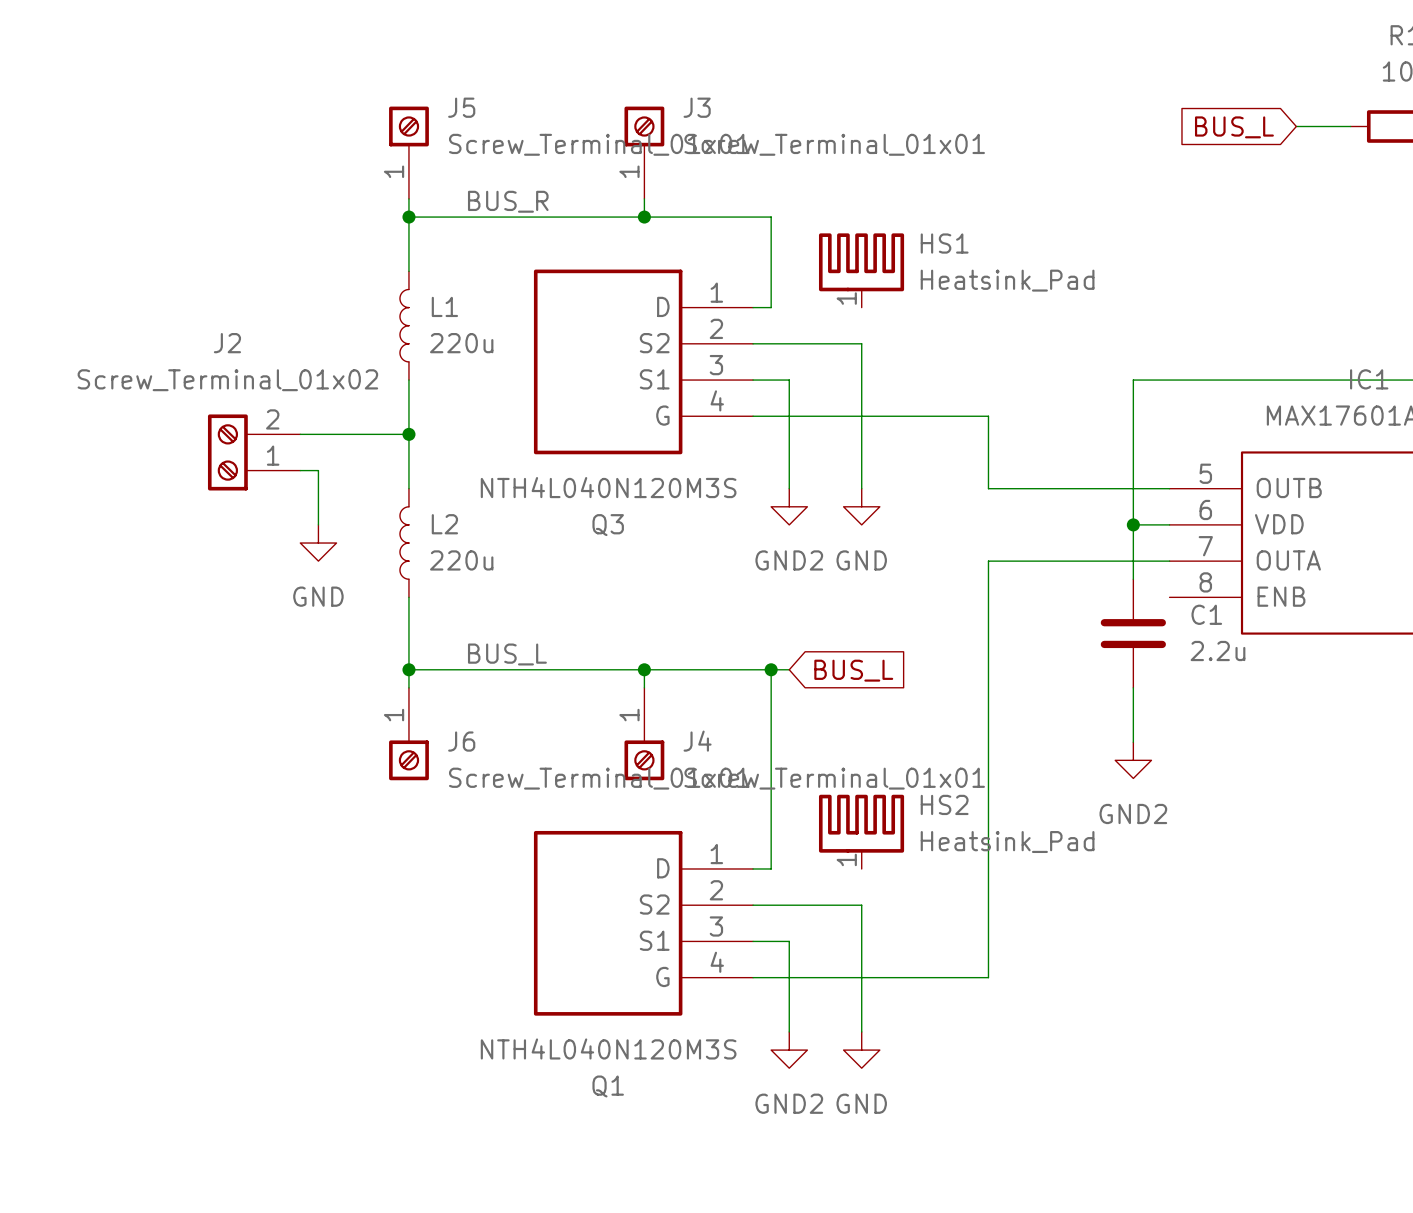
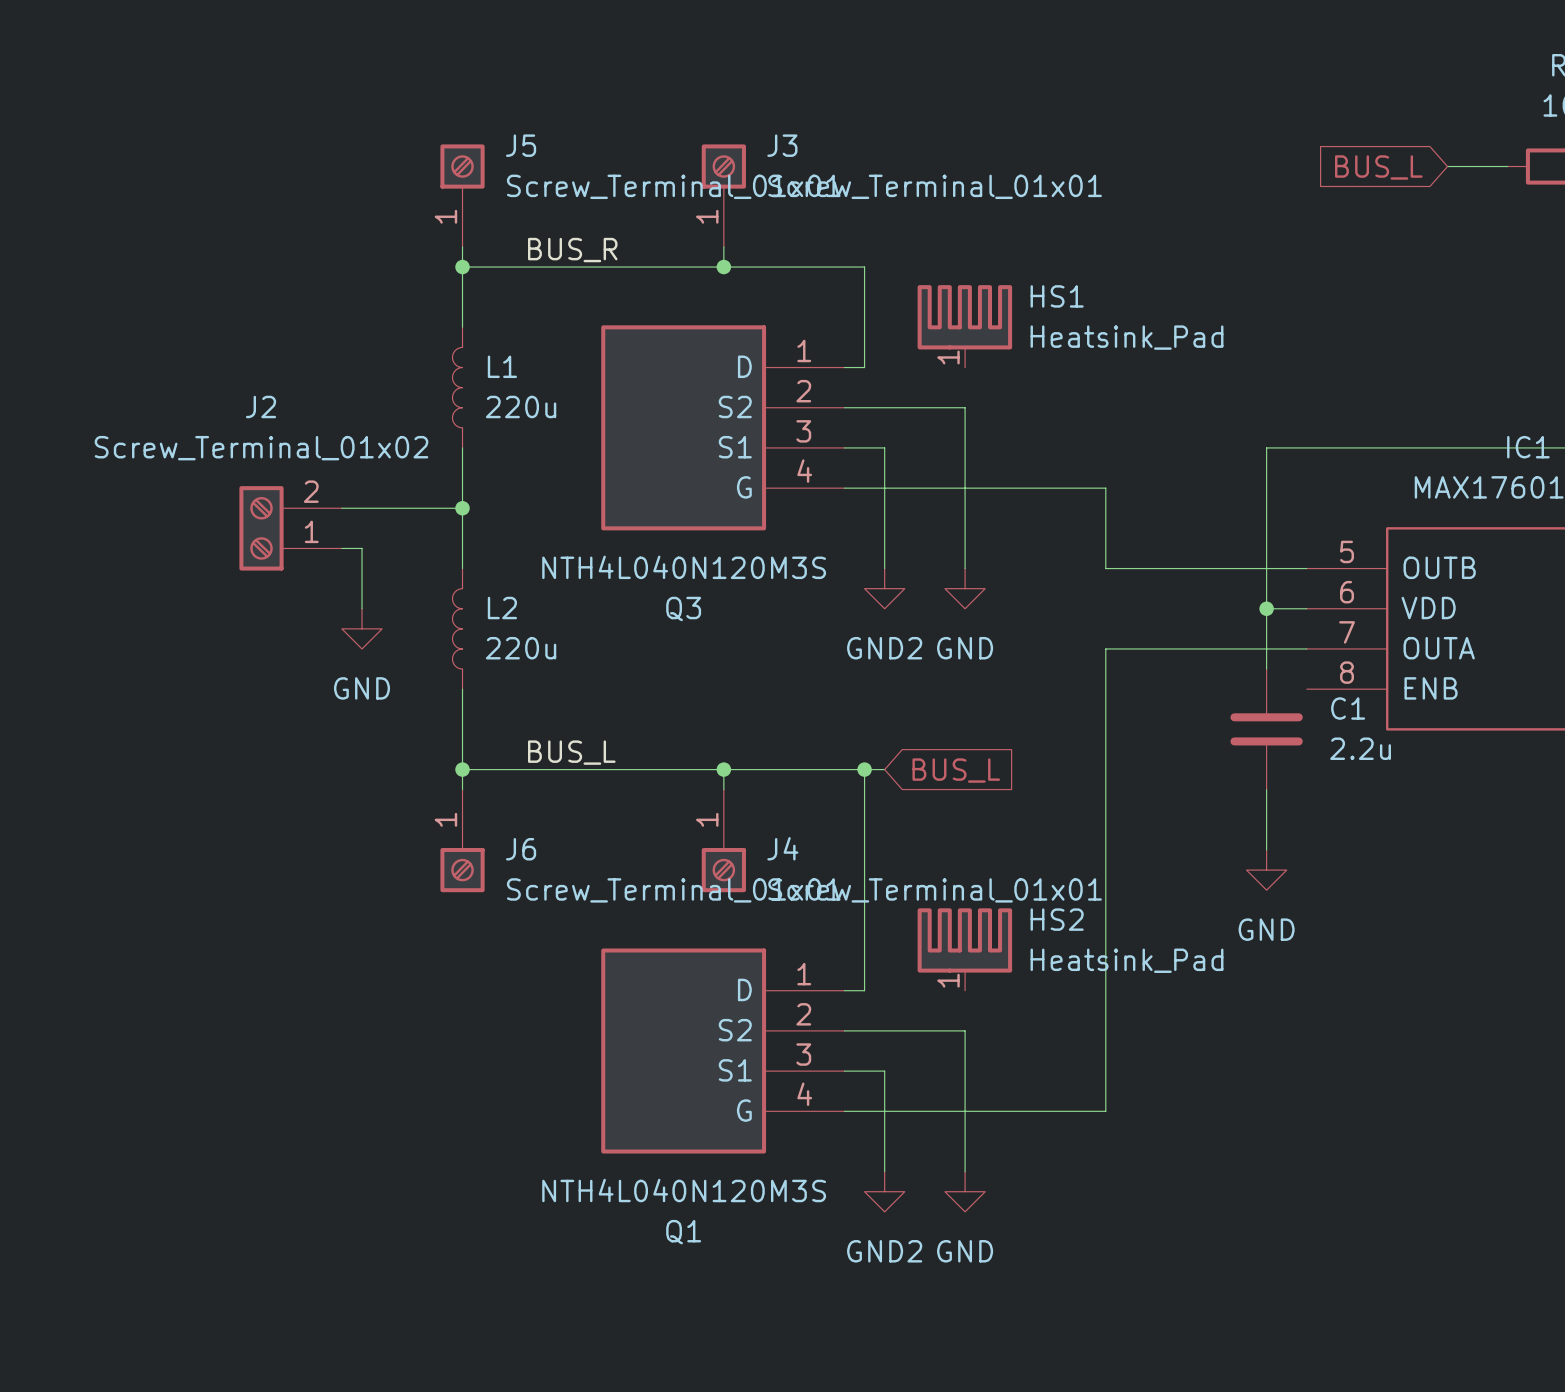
power symbol: GND2 (1133, 760) -> GND (1266, 870)

